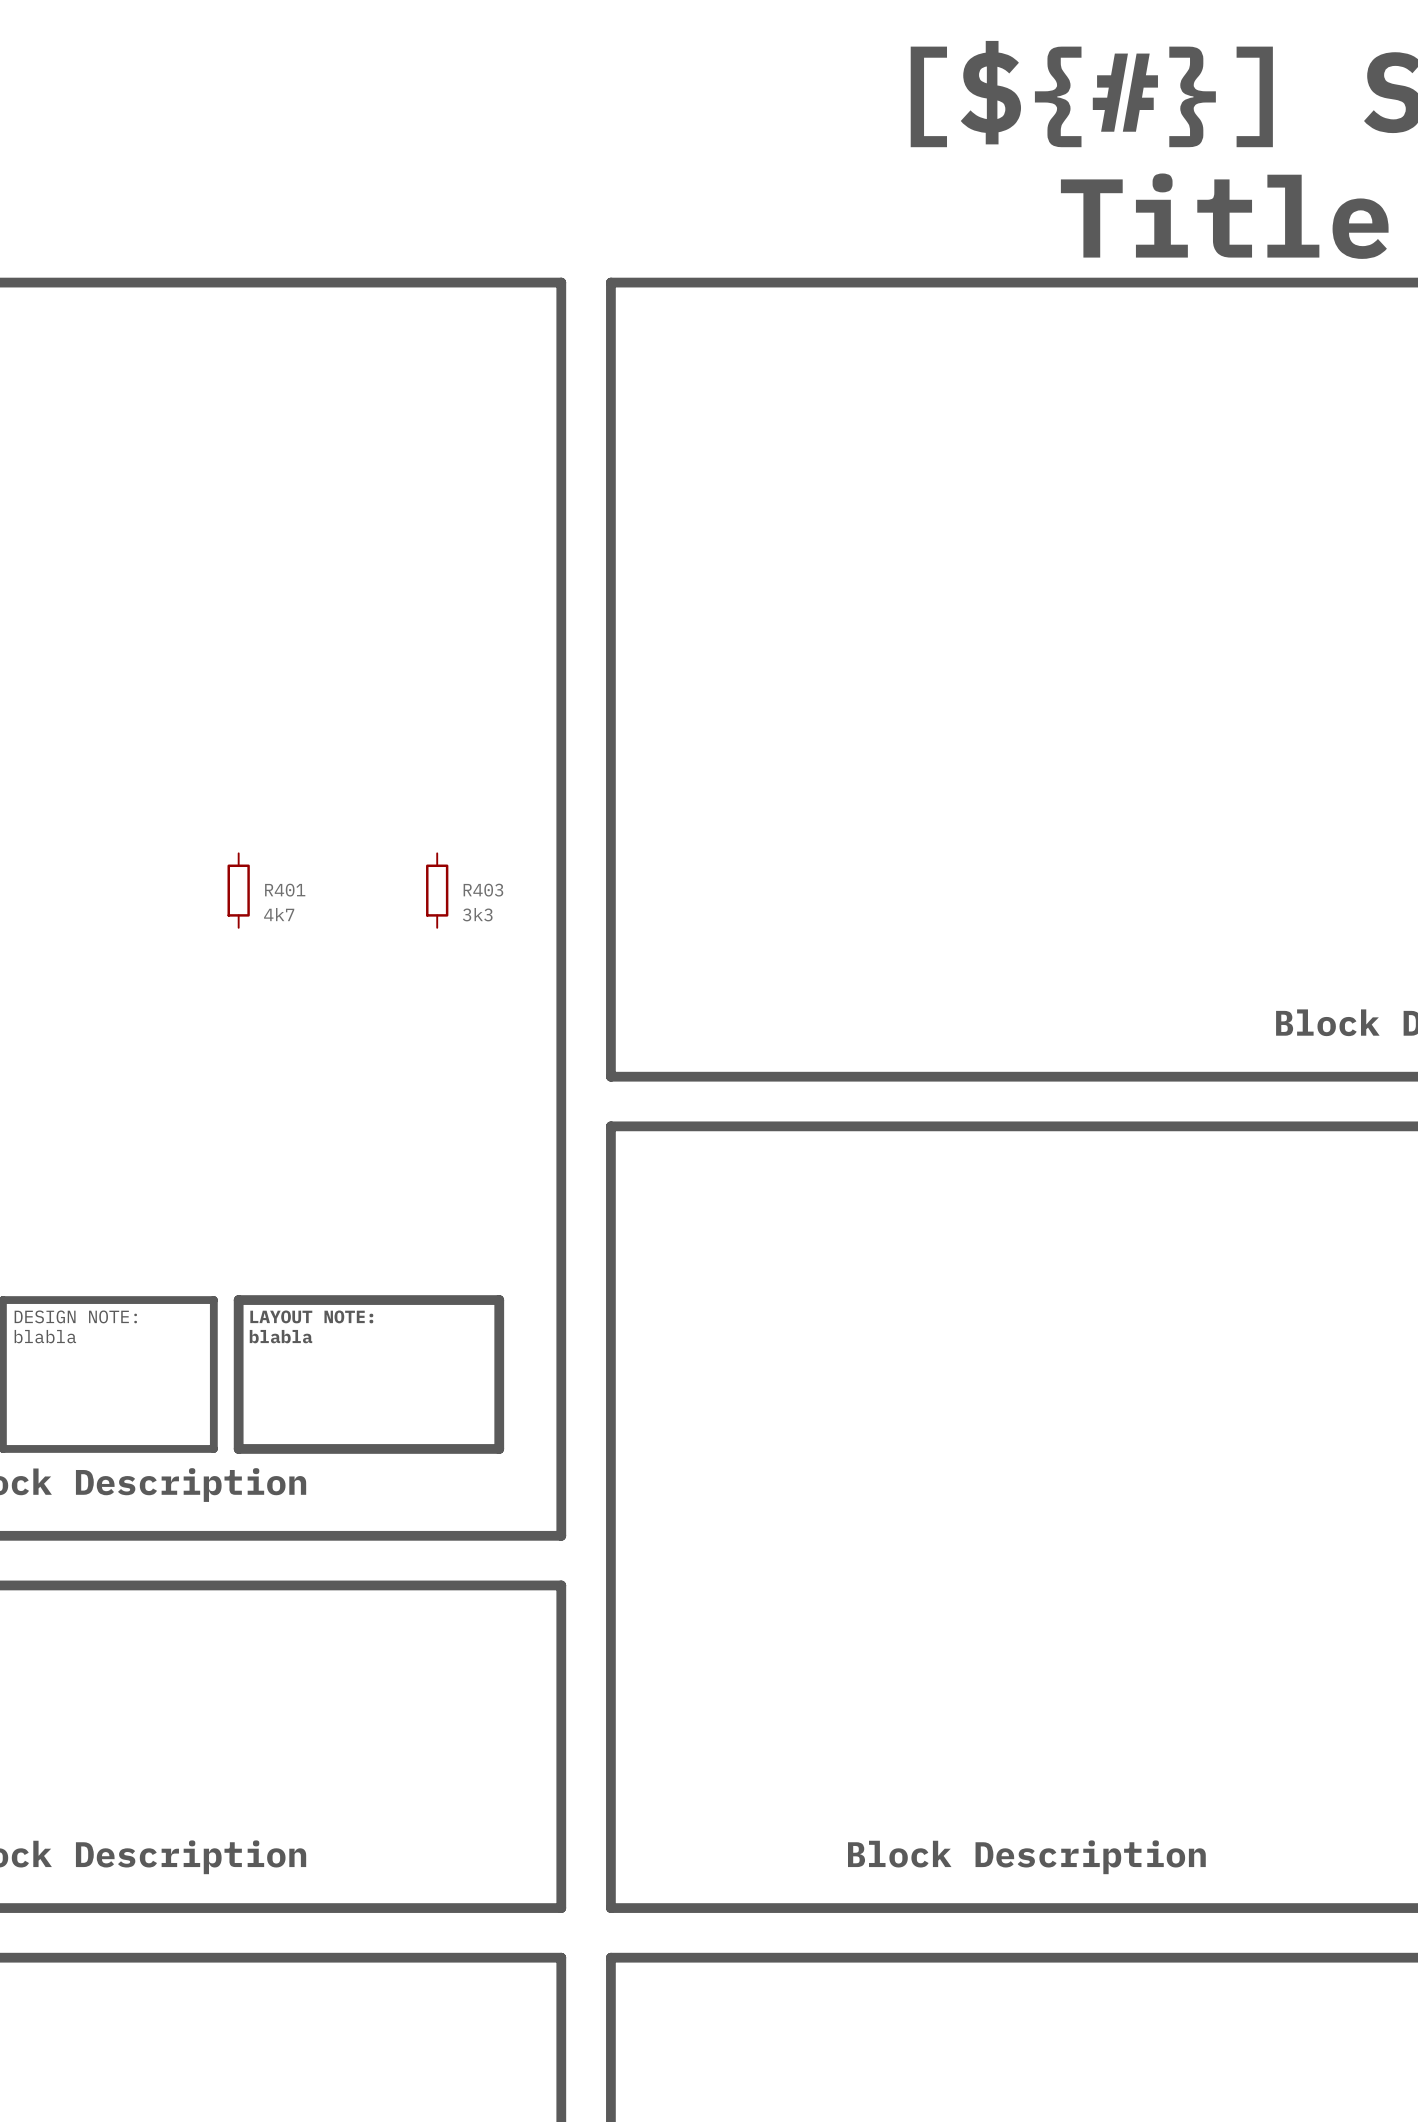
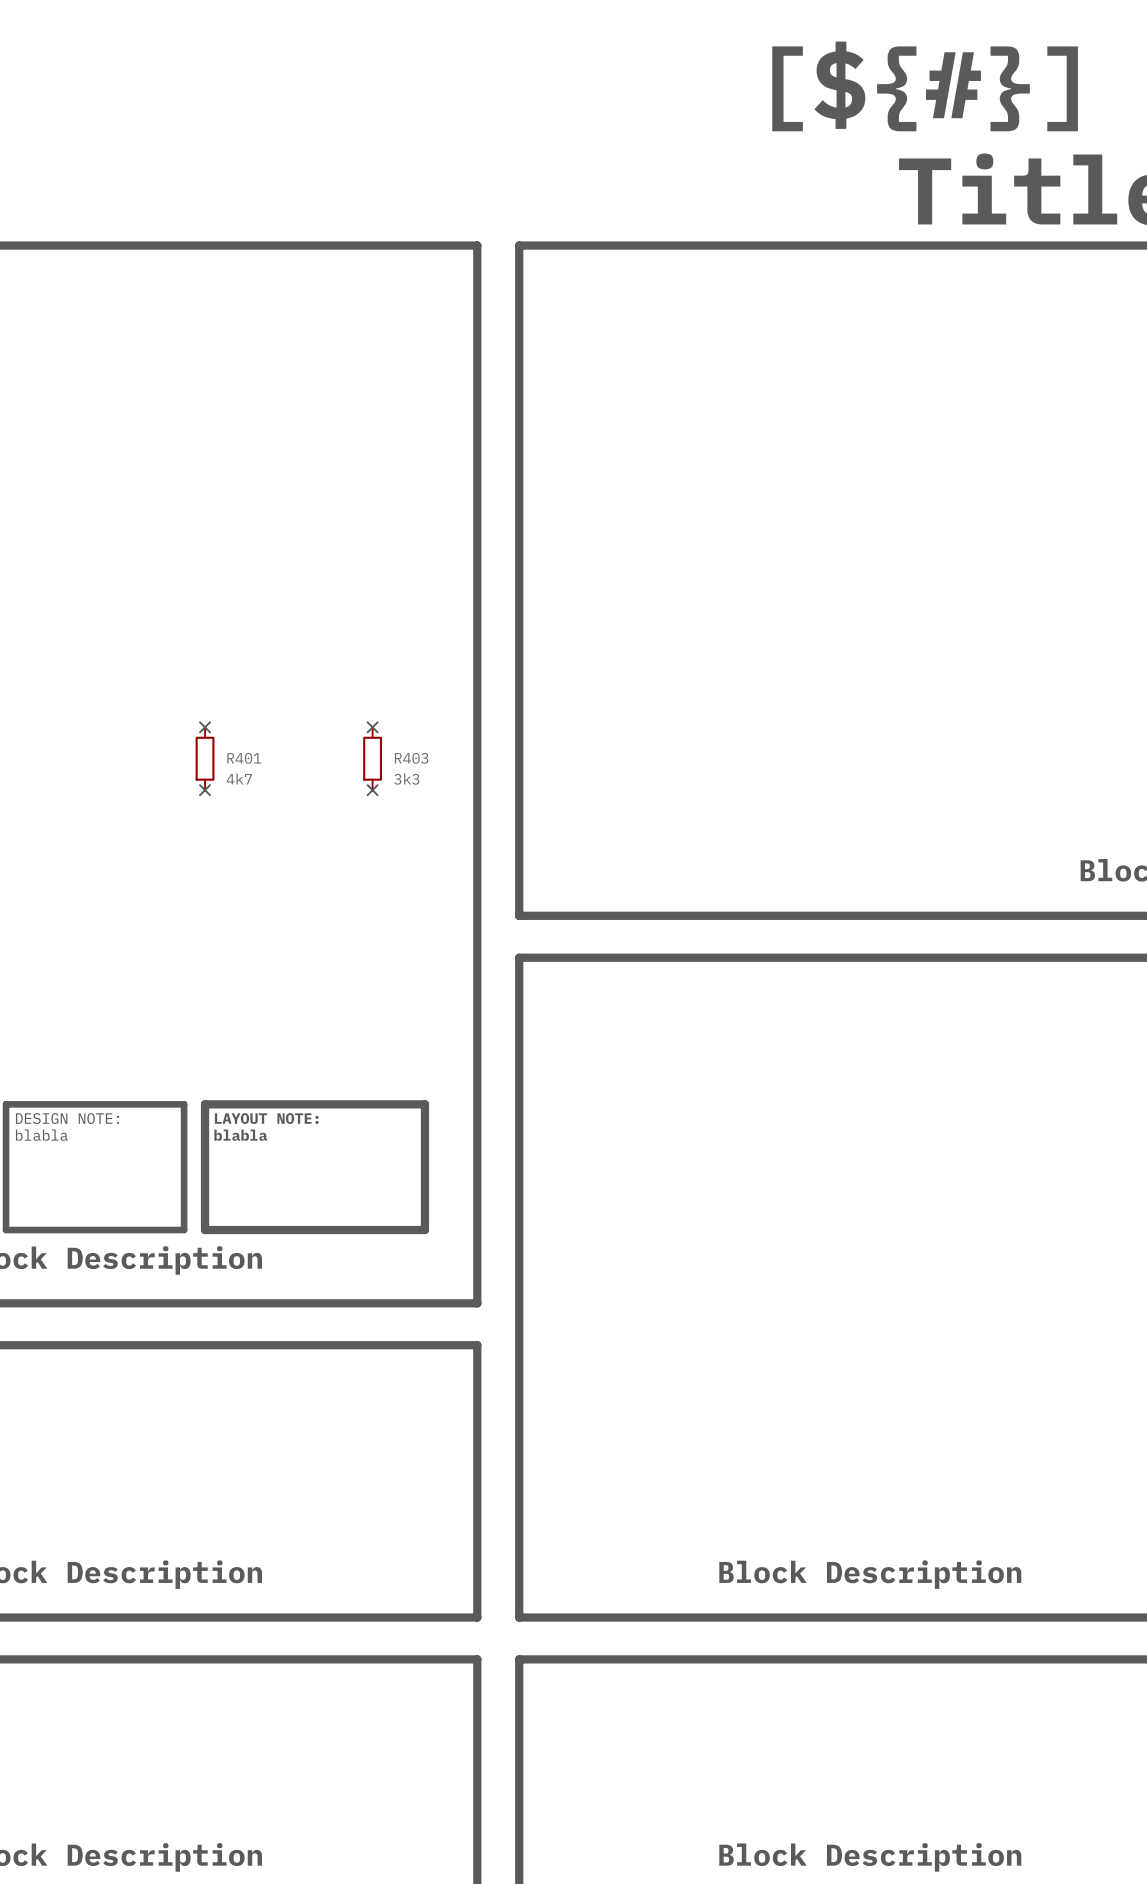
no-connect mark: none -> (205, 727)
no-connect mark: none -> (372, 727)
no-connect mark: none -> (205, 790)
no-connect mark: none -> (372, 790)

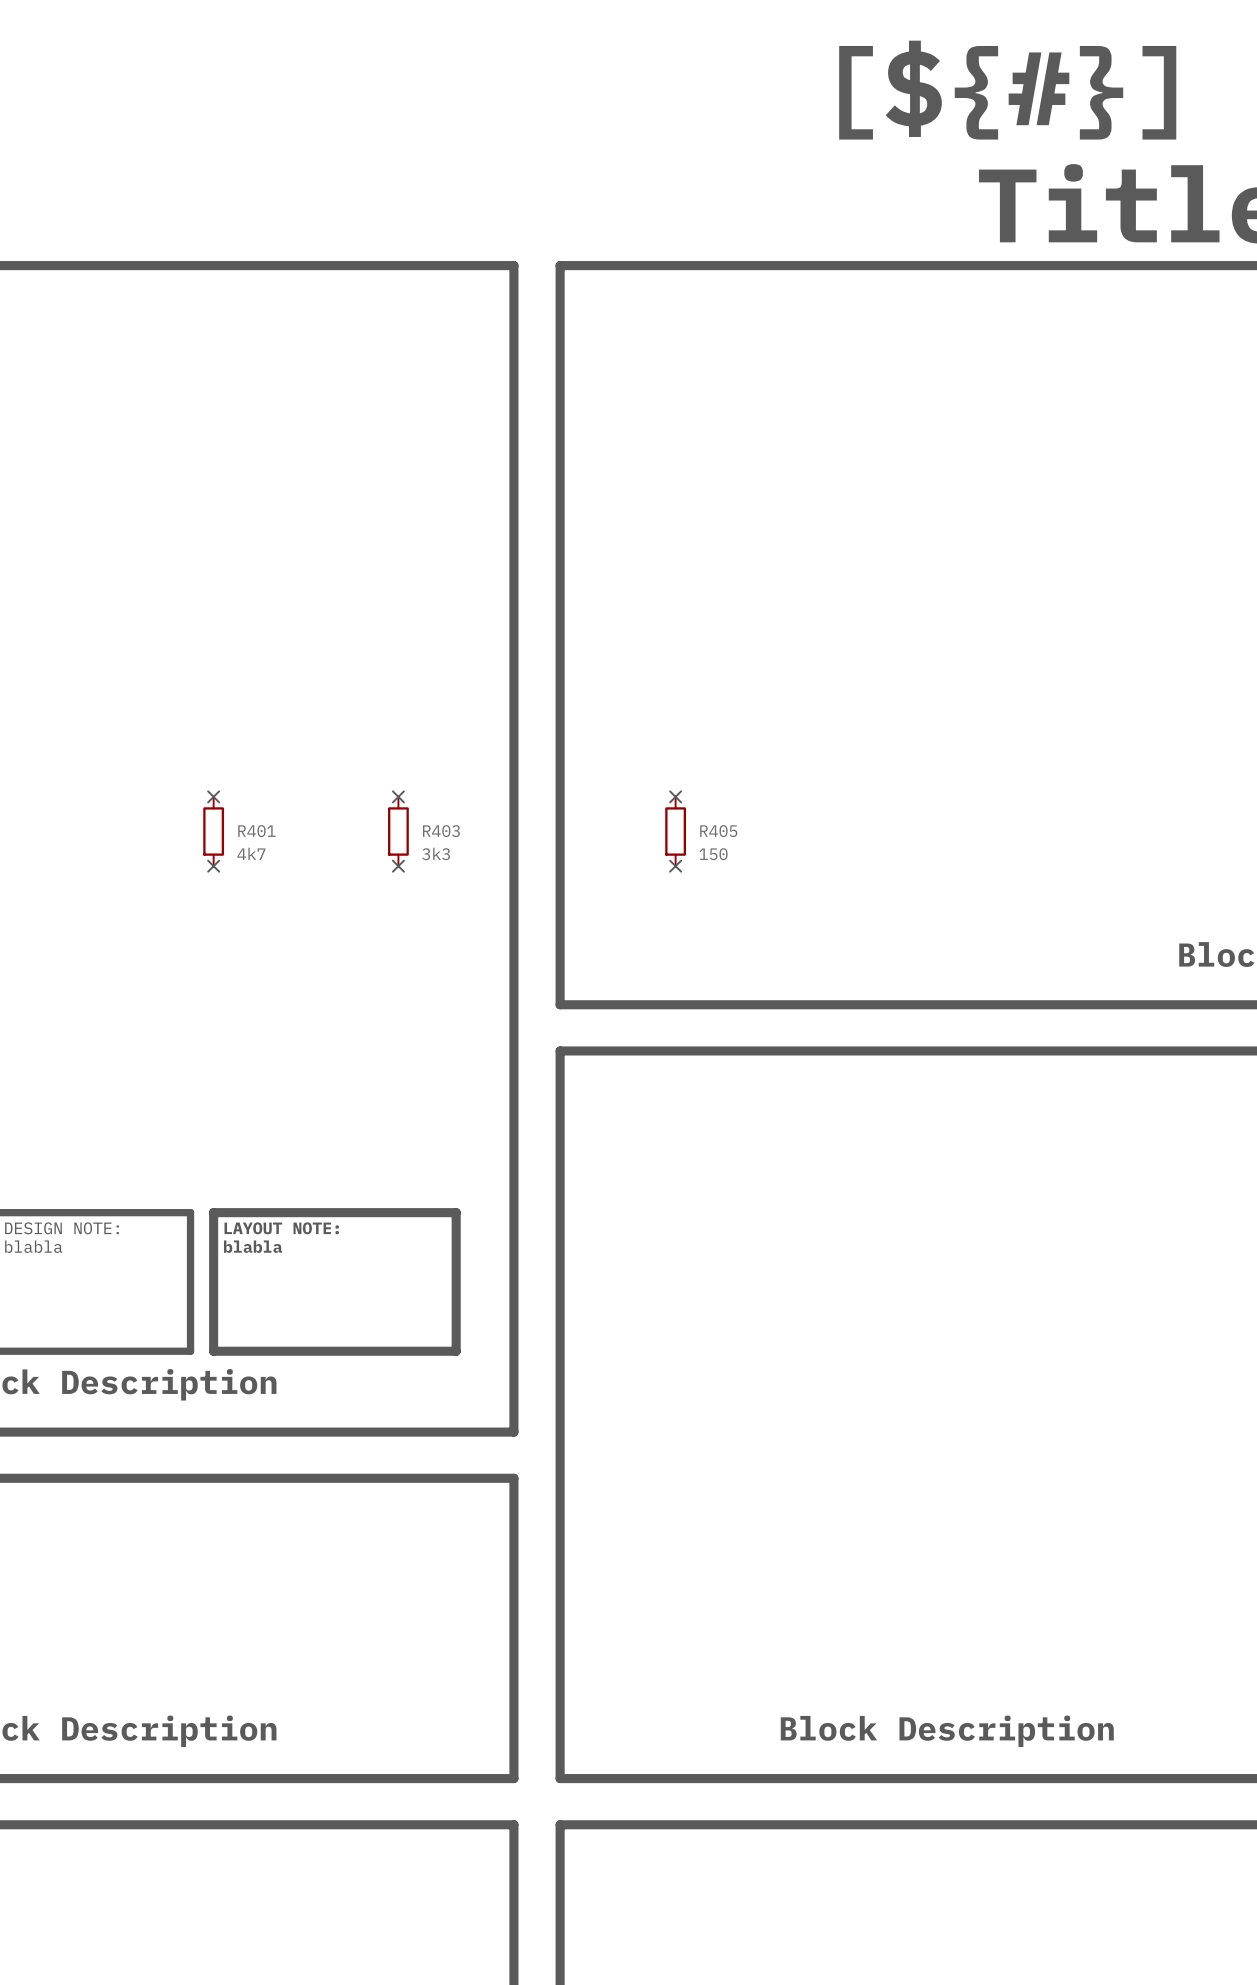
no-connect mark: none -> (675, 796)
R405: none -> 150 (675, 831)
no-connect mark: none -> (675, 866)

